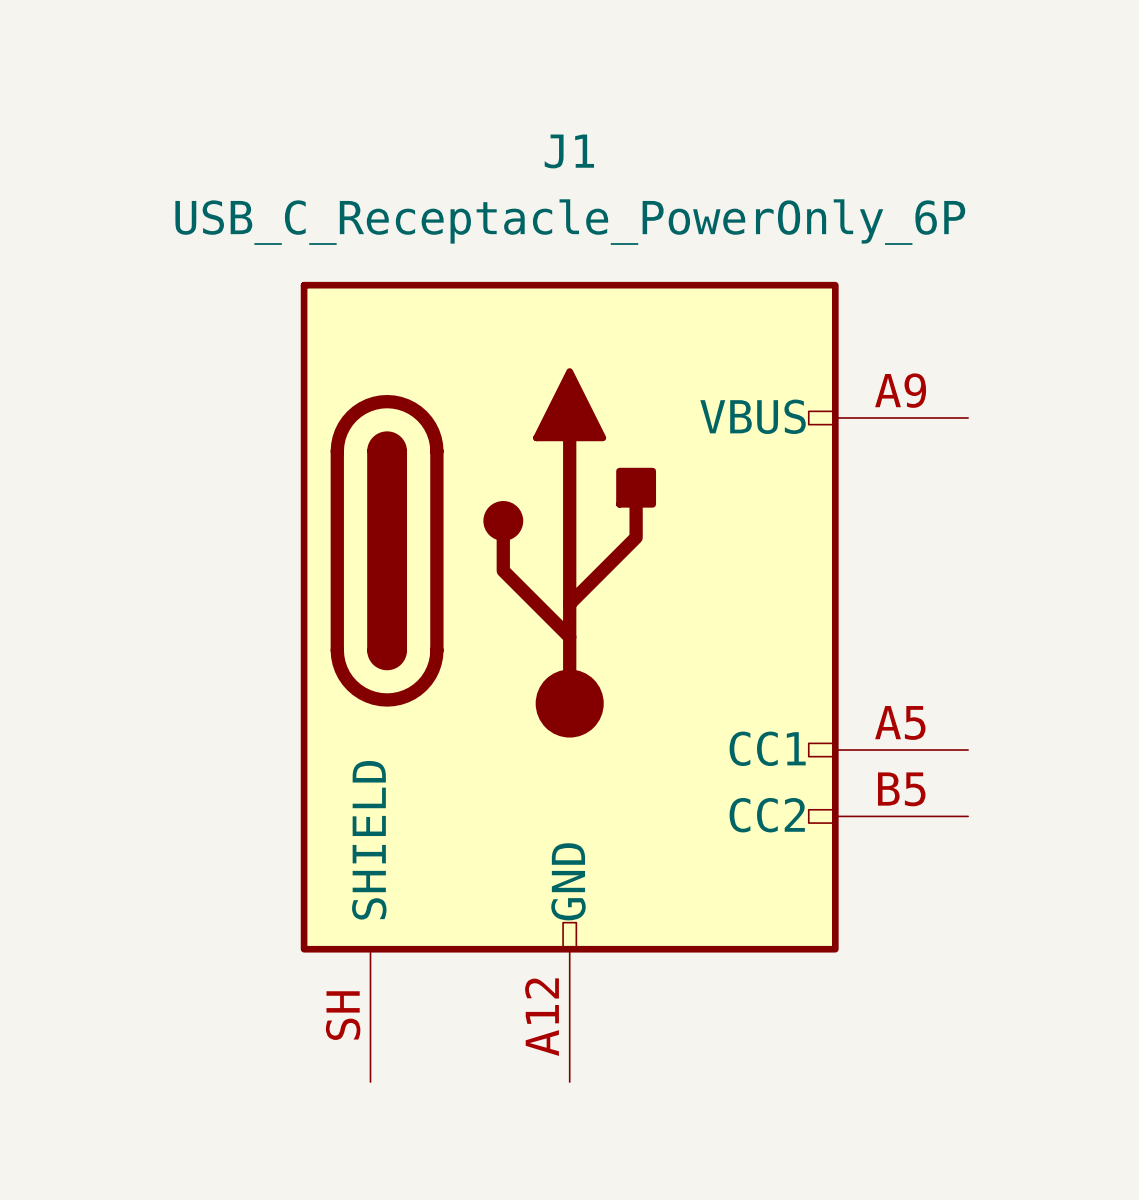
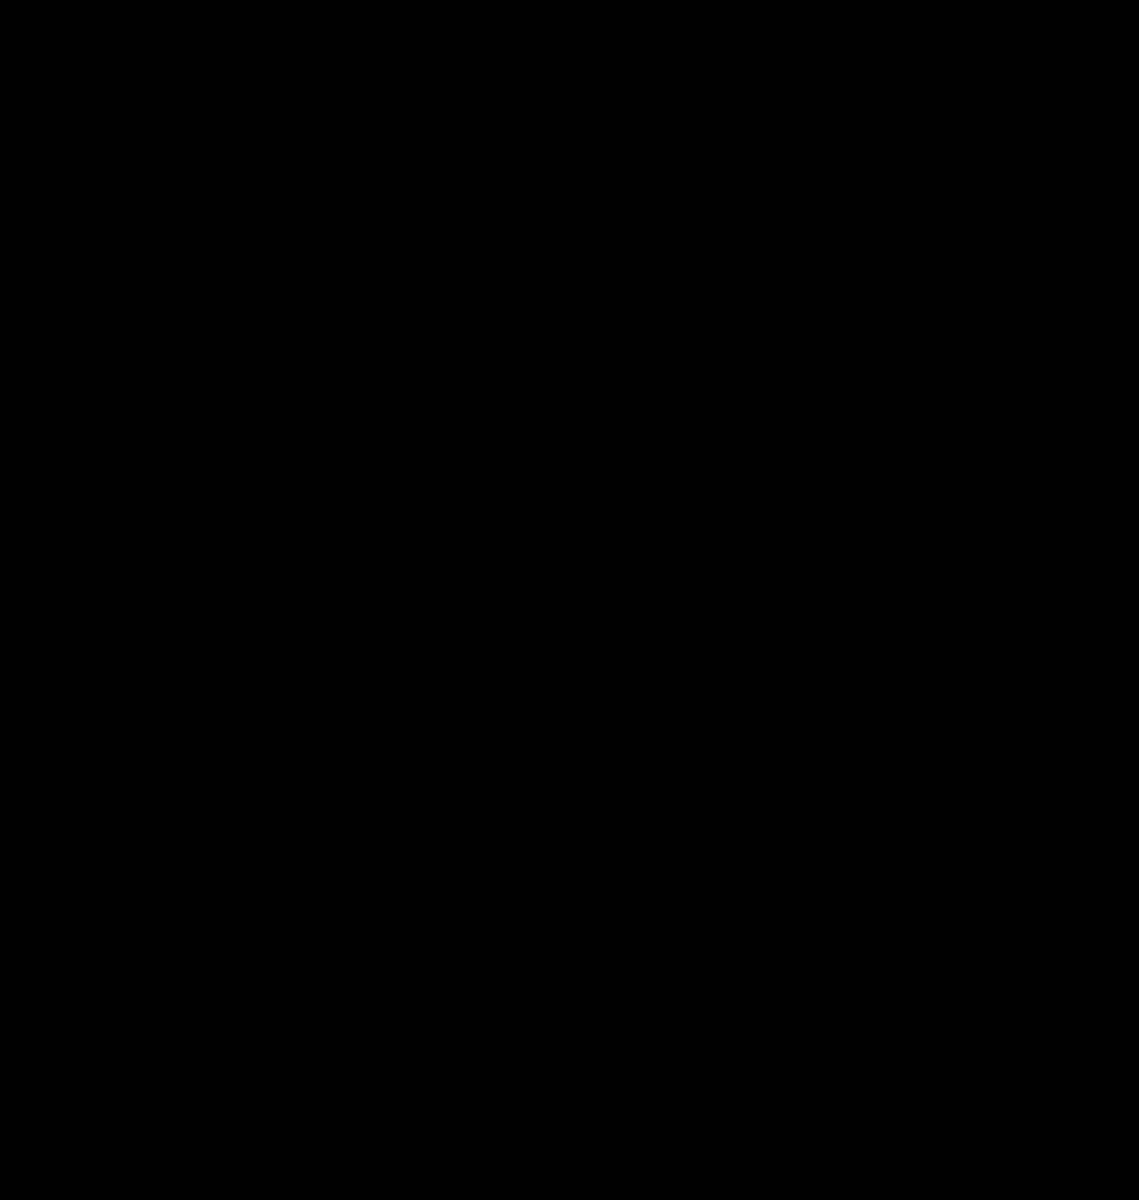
J1: USB_C_Receptacle_PowerOnly_6P (634, 681) -> none

